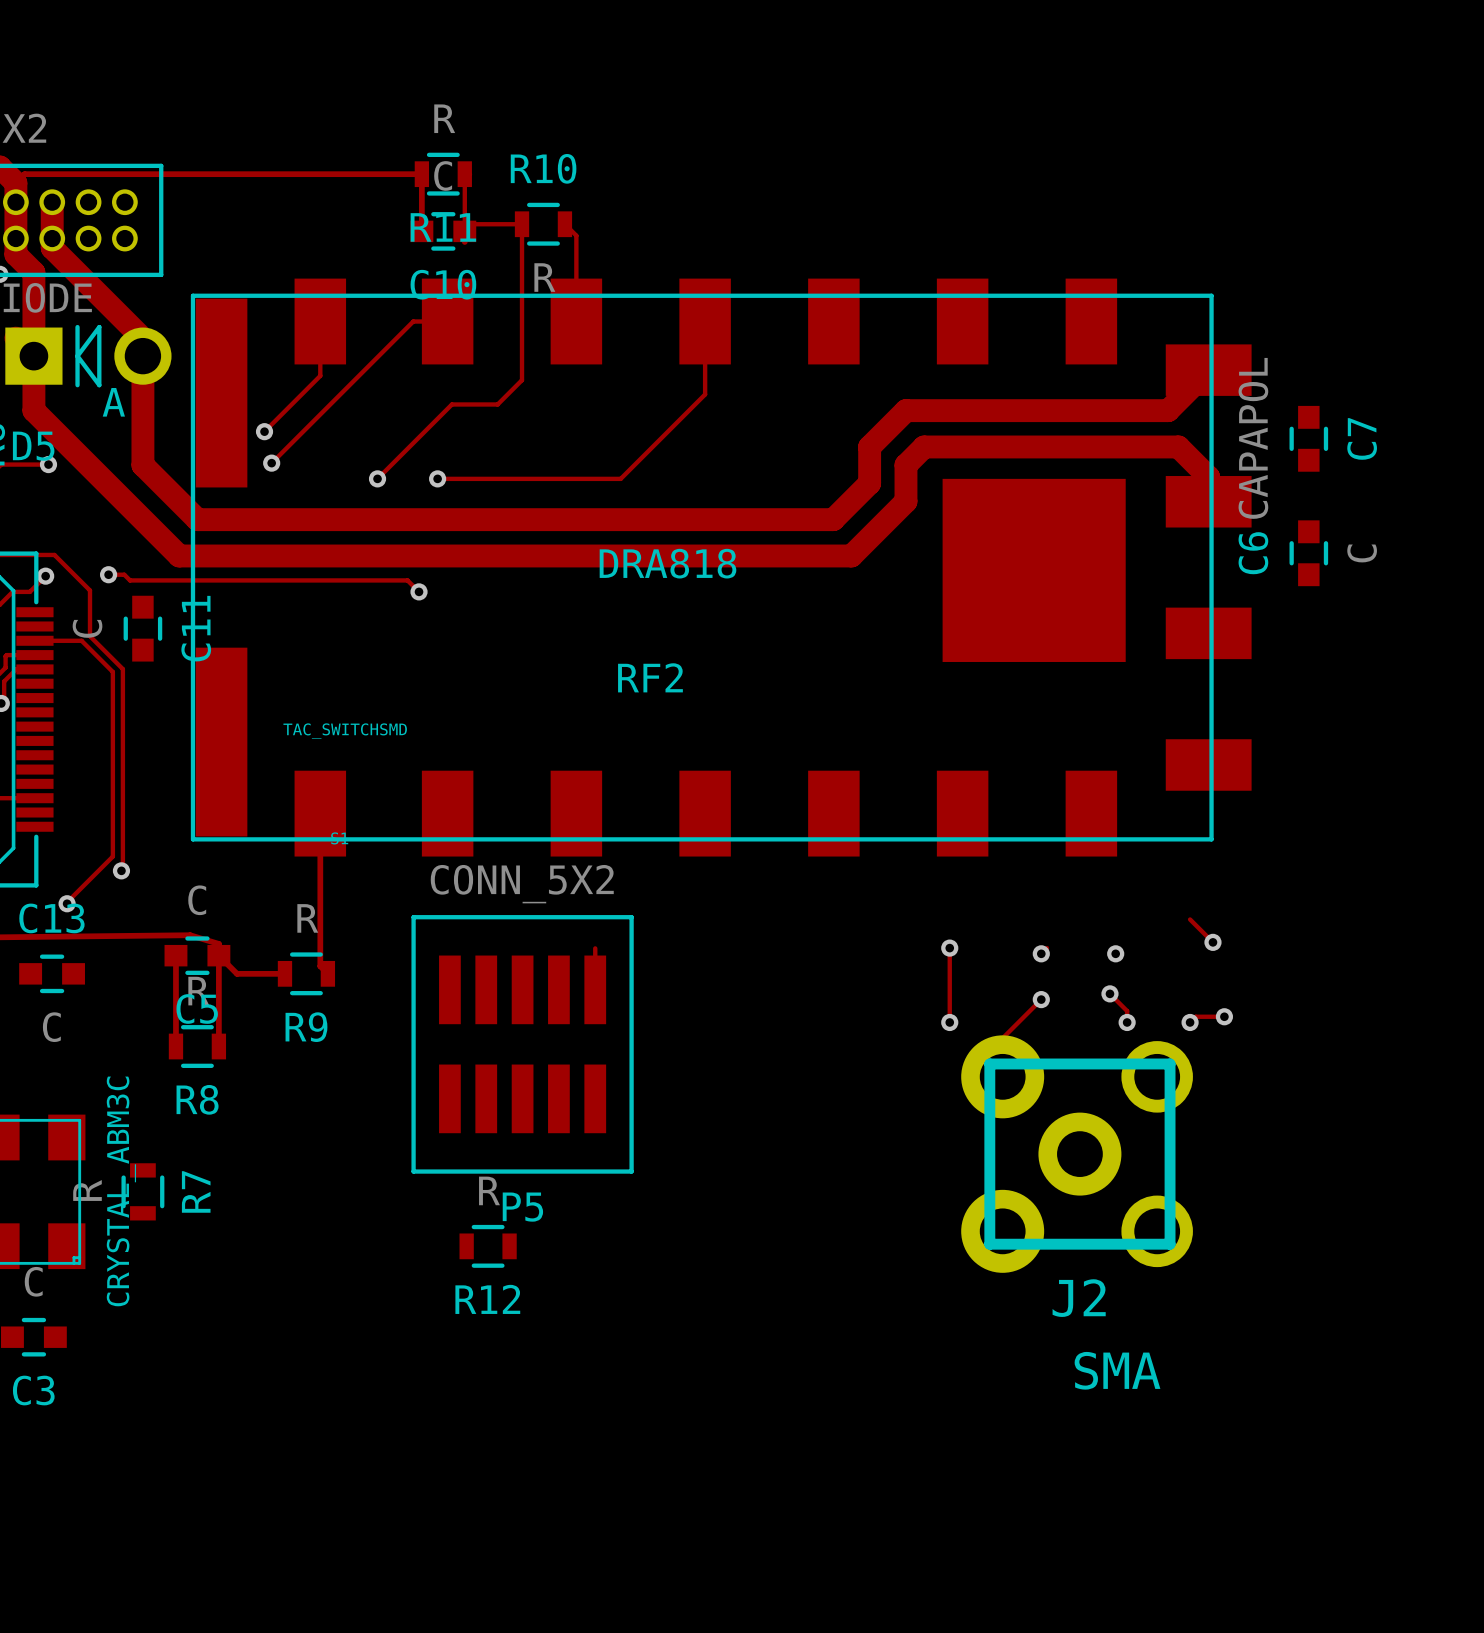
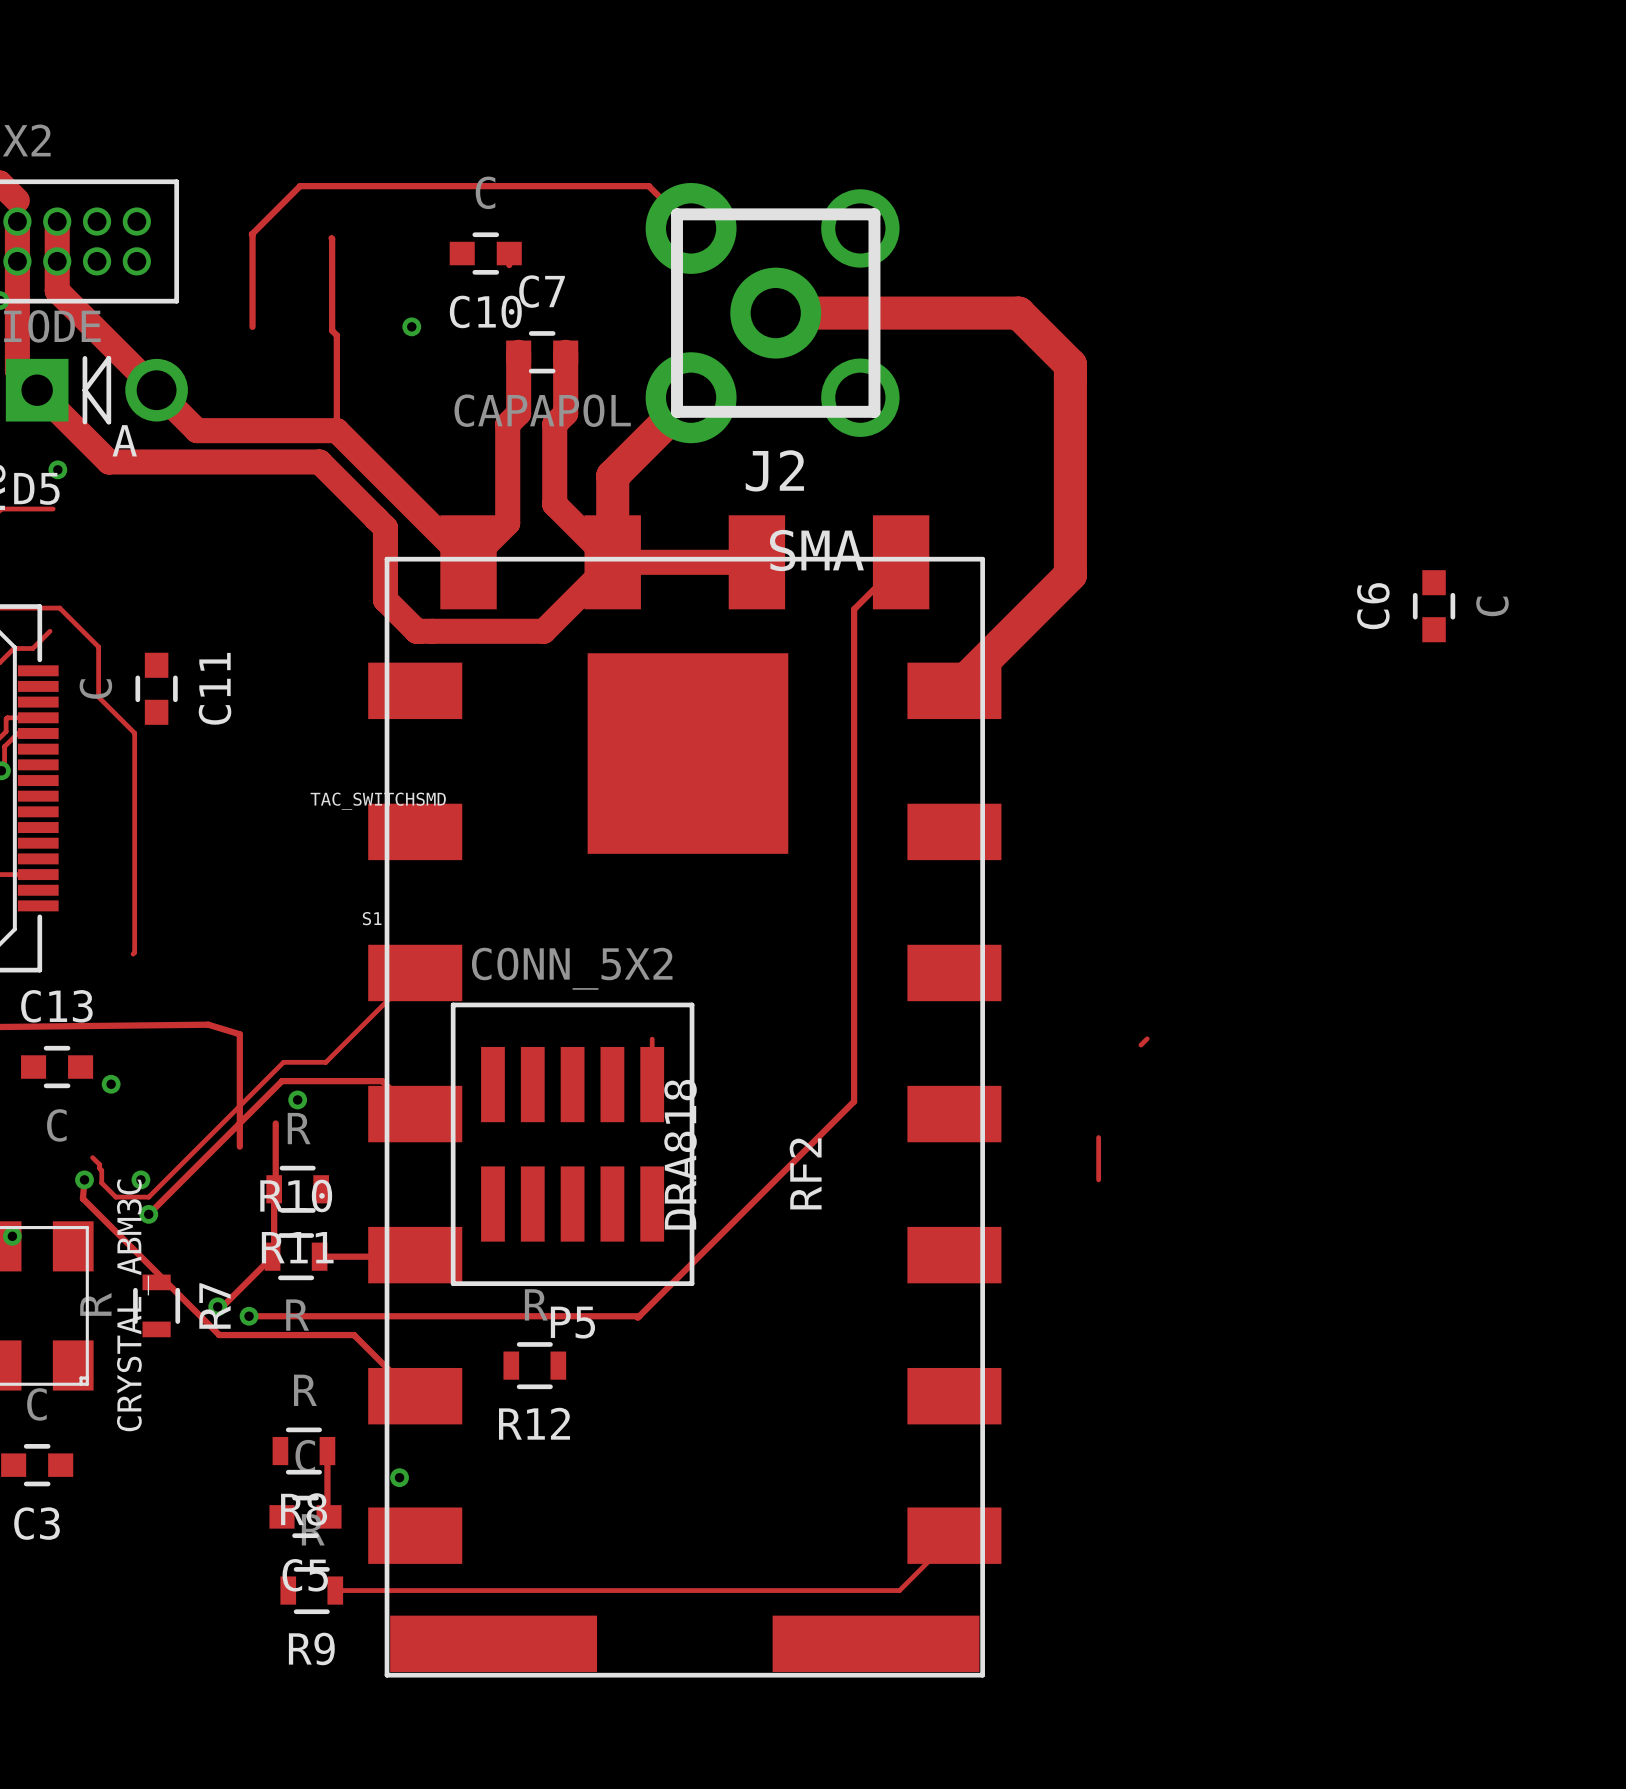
R11 position: (443, 174) -> (297, 1189)
track: (464, 174) (469, 174) (464, 179) (464, 231) (471, 224) (522, 224) (522, 380) (497, 404) (451, 404) (377, 478) -> none
track: (15, 202) (15, 183) (24, 174) (421, 174) (421, 231) -> none
track: none -> (691, 228) (648, 186) (300, 186) (251, 234) (252, 326)
track: none -> (331, 238) (332, 330) (336, 335) (336, 430)
R10 position: (543, 224) -> (296, 1256)
track: (564, 224) (576, 235) (576, 321) -> none
track: (52, 247) (142, 338) (142, 465) (197, 519) (833, 519) (869, 483) (869, 446) (905, 410) (1168, 410) (1208, 370) -> (57, 271) (57, 290) (197, 430) (336, 430)
track: (15, 254) (33, 272) (33, 410) (179, 555) (851, 555) (905, 501) (905, 465) (924, 446) (1178, 446) (1208, 477) (1208, 501) -> (17, 278) (17, 370)
track: none -> (775, 313) (1018, 313) (1070, 364) (1070, 574) (954, 690)
via: none -> (411, 326)
track: (320, 321) (320, 375) (264, 431) -> none
track: (447, 321) (413, 321) (271, 463) -> none
track: none -> (518, 352) (518, 413) (507, 424) (507, 523) (468, 562) (336, 430)
track: none -> (565, 352) (565, 413) (554, 424) (554, 504) (612, 562)
track: (705, 321) (705, 394) (620, 478) (437, 478) -> none
track: none -> (37, 390) (108, 462) (319, 462) (385, 527) (385, 599) (416, 631) (543, 631) (612, 562)
track: none -> (691, 397) (612, 476) (612, 562)
via: (264, 431) -> none
C7 value position: CAPAPOL (1253, 438) -> CAPAPOL (542, 410)
C7 rotation: 0° (1308, 438) -> 90° clockwise (542, 352)
C7 position: (1308, 438) -> (542, 352)
C7 name position: C7 (1362, 438) -> C7 (542, 291)
via: (271, 463) -> none
via position: (48, 464) -> (57, 469)
via: (377, 478) -> none
via: (437, 478) -> none
track: none -> (612, 562) (756, 562)
track: none -> (901, 562) (854, 609) (854, 1101) (637, 1317)
RF2 rotation: 0° (721, 567) -> 90° counterclockwise (684, 1096)
track: (108, 574) (124, 574) (130, 580) (407, 580) (419, 591) -> none
via: (108, 574) -> none
via: (45, 576) -> none
via: (419, 591) -> none
track: (34, 640) (81, 640) (112, 672) (112, 856) (67, 903) -> none
track: (320, 813) (320, 966) (327, 973) -> none
via: (121, 870) -> none
track: none -> (415, 972) (325, 1062) (283, 1062) (148, 1197) (115, 1197) (101, 1183) (99, 1164) (92, 1157)
via: (67, 903) -> none
track: (1190, 919) (1212, 942) -> none
via: (1212, 942) -> none
track: (949, 948) (949, 1022) -> none
via: (949, 948) -> none
via: (1041, 953) -> none
via: (1115, 953) -> none
track: (175, 955) (175, 1046) -> none
C5 position: (197, 955) -> (305, 1516)
track: (218, 955) (237, 973) (284, 973) -> none
R9 position: (306, 973) -> (311, 1590)
via: none -> (111, 1084)
track: (1109, 993) (1127, 1011) (1127, 1022) -> none
via: (1109, 993) -> none
track: (1041, 999) (1002, 1038) -> none
via: (1041, 999) -> none
via: none -> (297, 1099)
track: none -> (415, 1114) (382, 1081) (281, 1081) (148, 1214)
track: (1224, 1016) (1195, 1016) (1190, 1022) -> none
via: (1224, 1016) -> none
via: (949, 1022) -> none
via: (1127, 1022) -> none
via: (1190, 1022) -> none
track: none -> (275, 1123) (274, 1255) (222, 1306) (217, 1306)
R8 position: (197, 1046) -> (303, 1451)
track: none -> (84, 1179) (82, 1198) (219, 1335) (354, 1335) (415, 1396)
via: none -> (84, 1179)
via: none -> (140, 1179)
via: none -> (148, 1214)
via: none -> (12, 1236)
track: none -> (415, 1255) (413, 1256) (319, 1256)
J2 position: (1077, 1154) -> (772, 313)
via: none -> (217, 1306)
track: none -> (249, 1316) (639, 1316)
via: none -> (249, 1316)
track: none -> (327, 1451) (327, 1515) (329, 1516)
via: none -> (399, 1477)
track: none -> (954, 1535) (899, 1590) (335, 1590)

